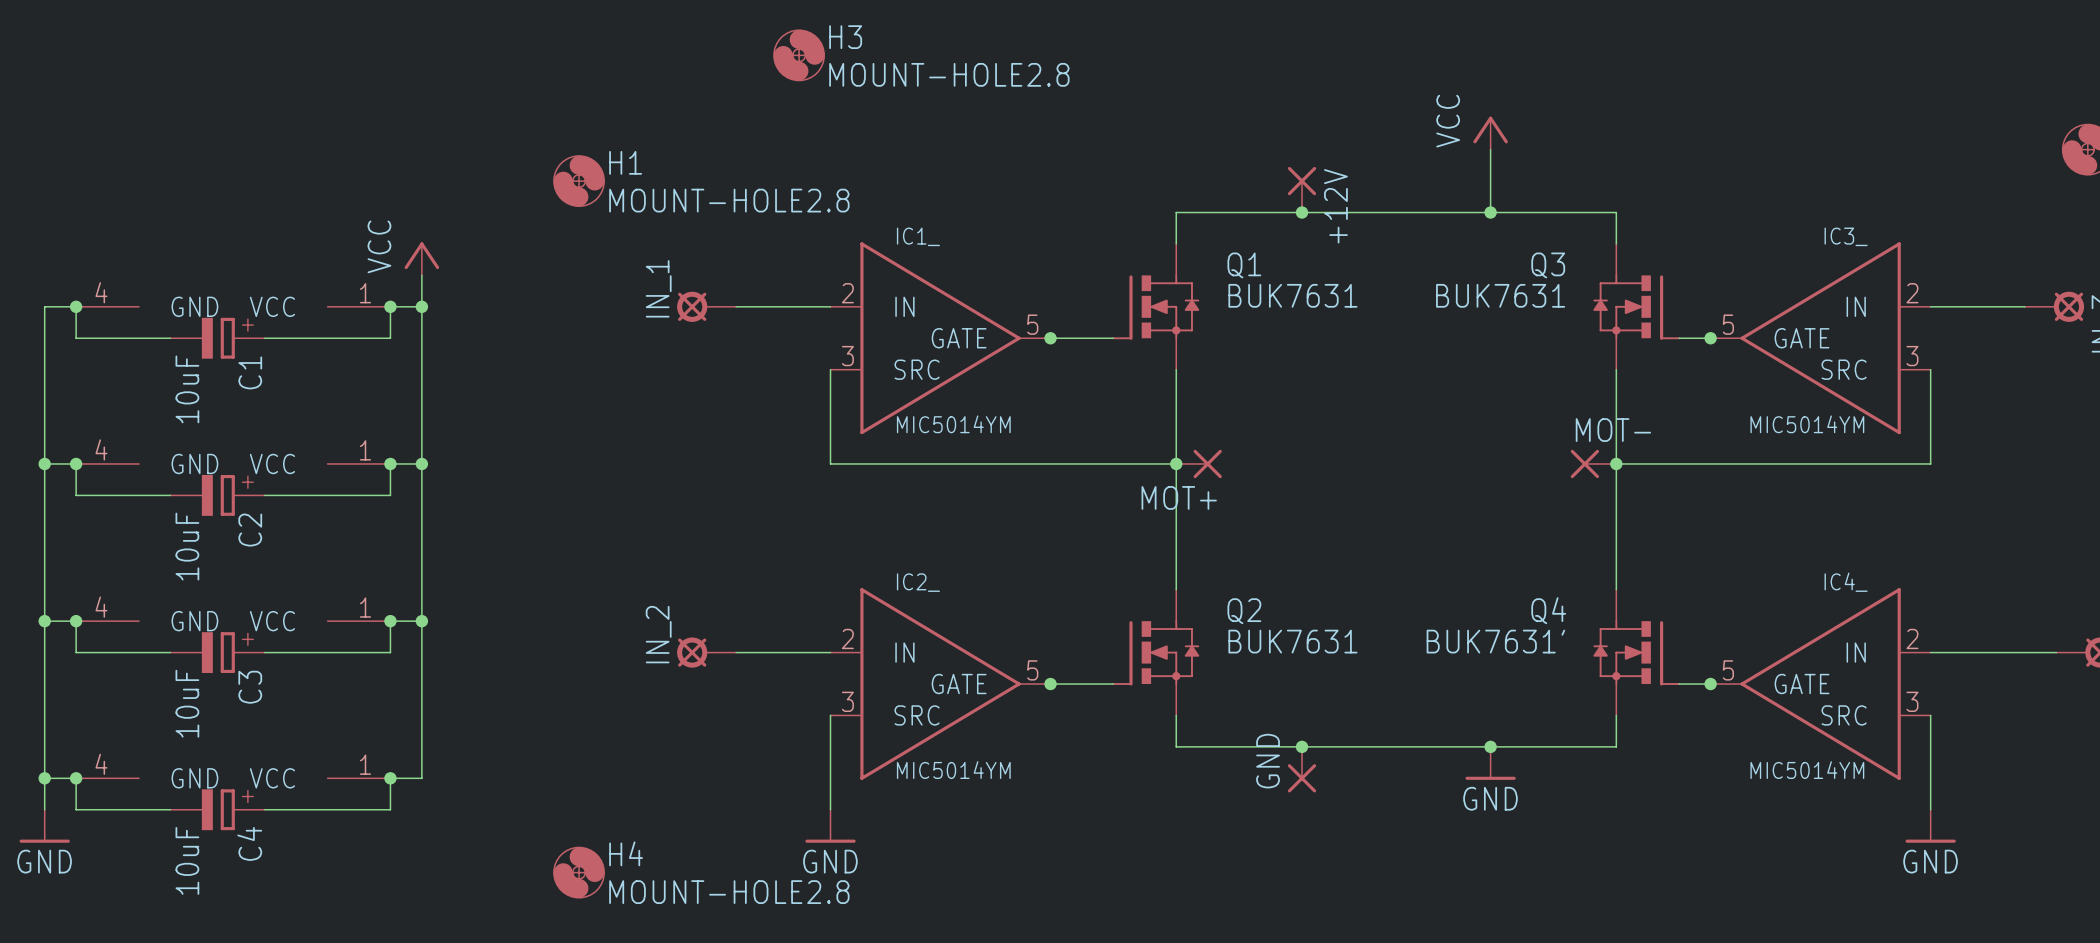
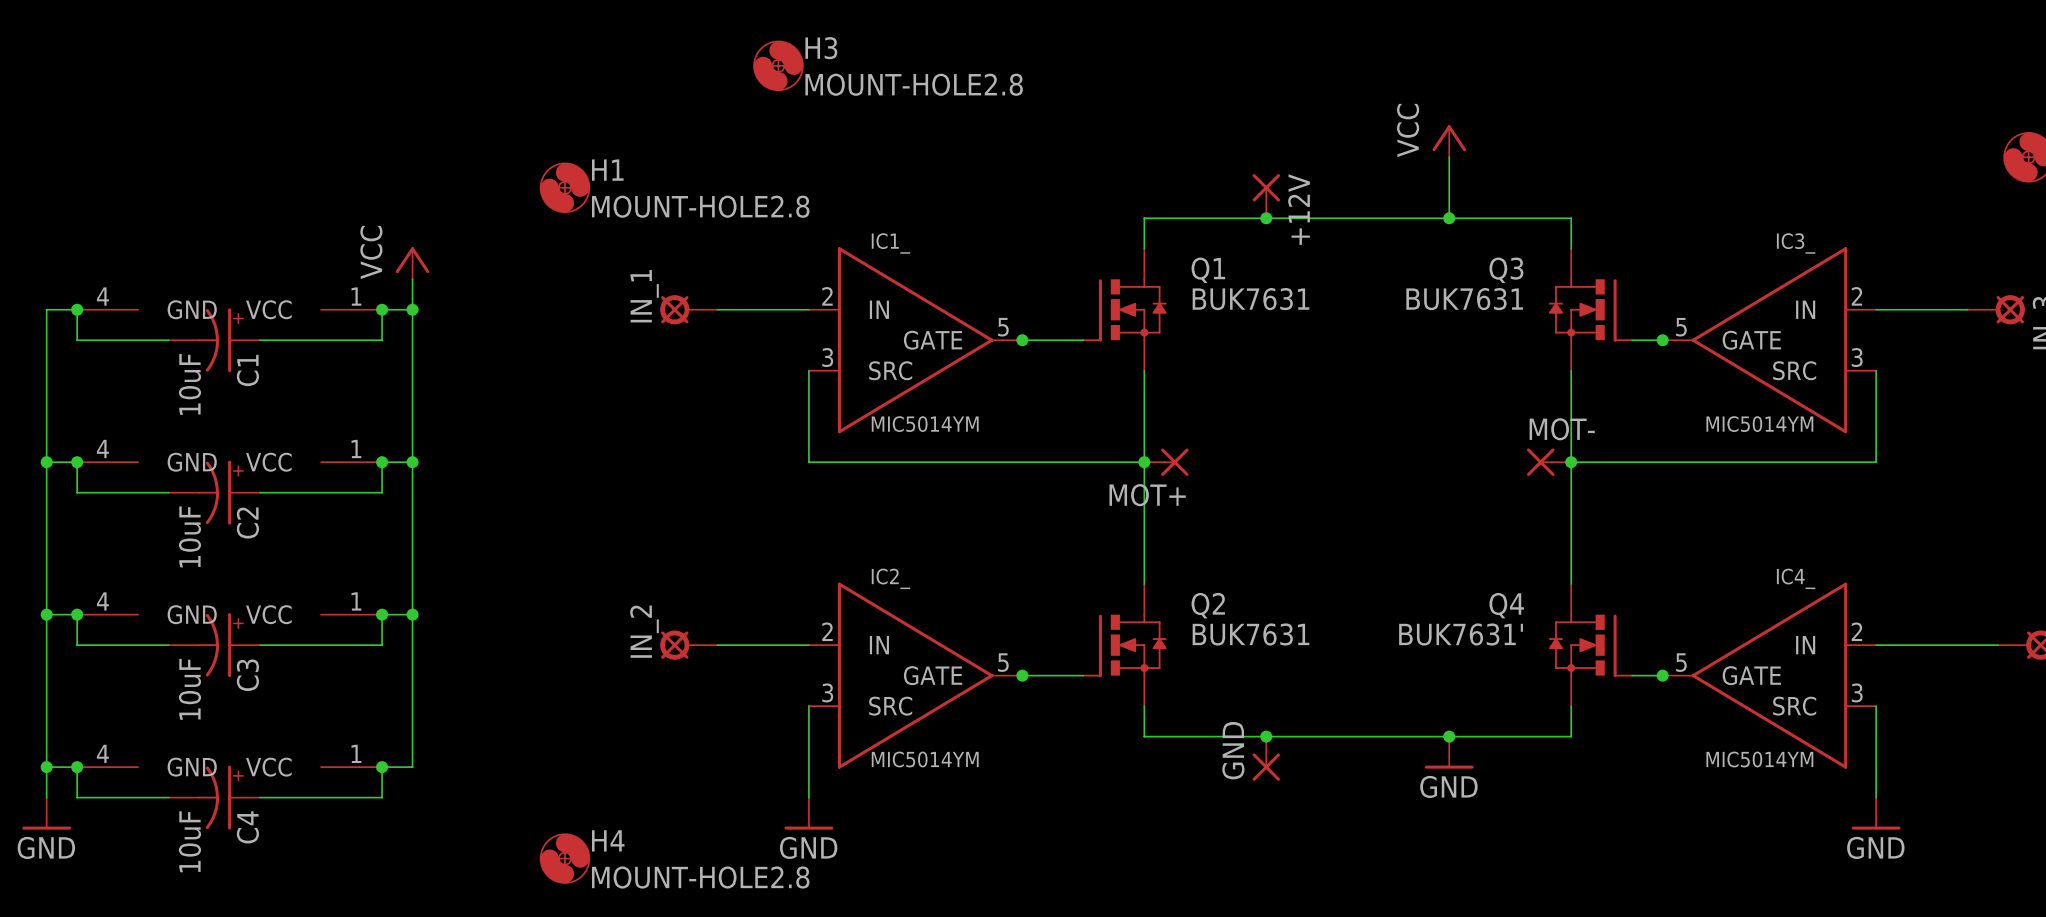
C1 symbol: [170, 317, 265, 359] -> [168, 308, 261, 373]
C2 symbol: [170, 474, 265, 516] -> [168, 460, 261, 525]
C3 symbol: [170, 632, 265, 674] -> [168, 613, 261, 678]
C4 symbol: [170, 789, 265, 831] -> [168, 765, 261, 830]

